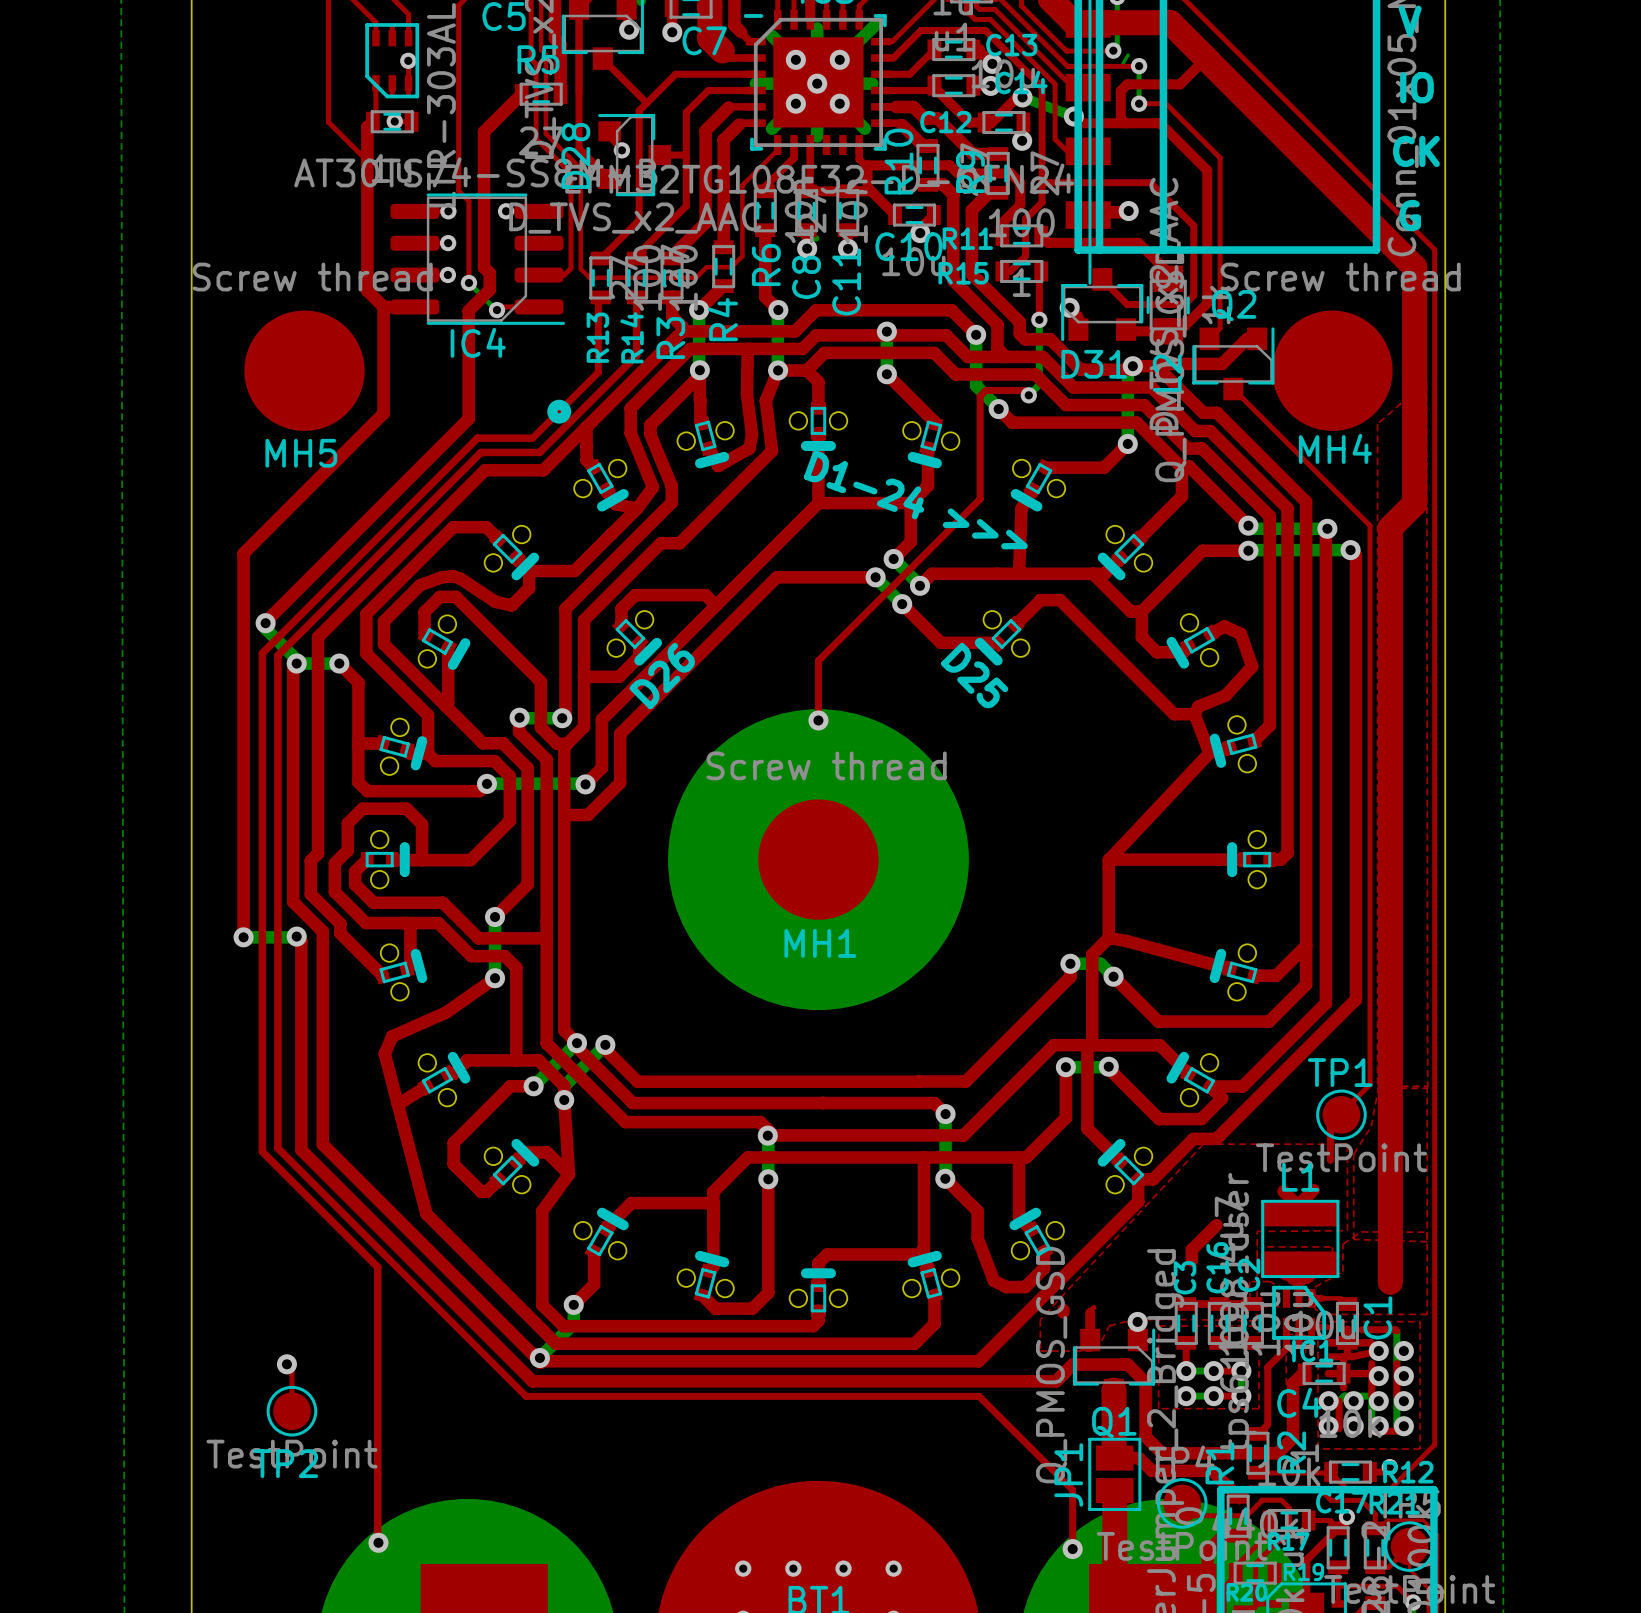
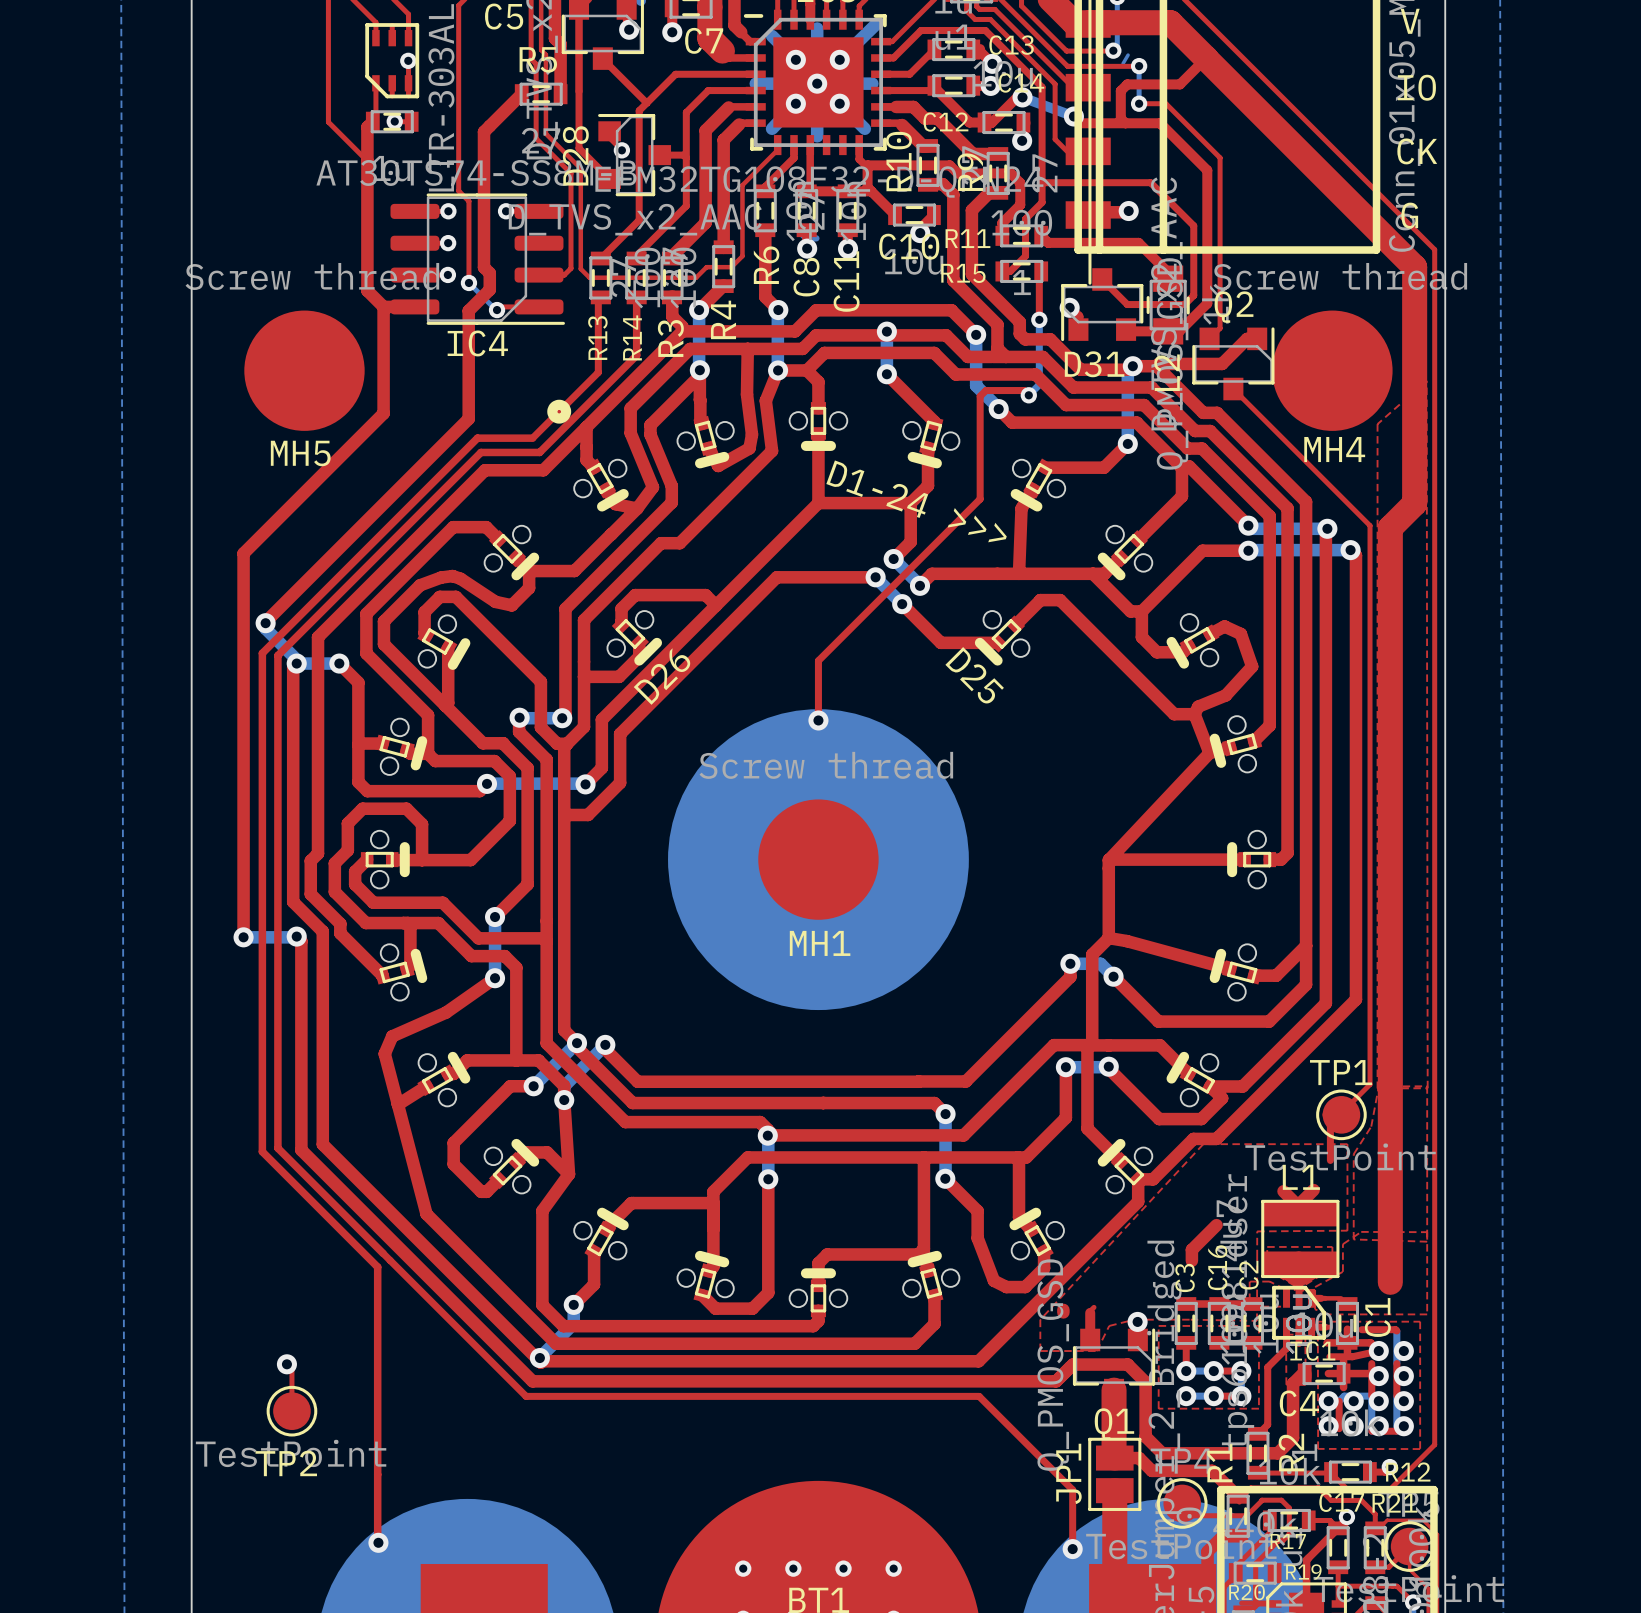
top track: none -> (1241, 1603) (1273, 1603)

